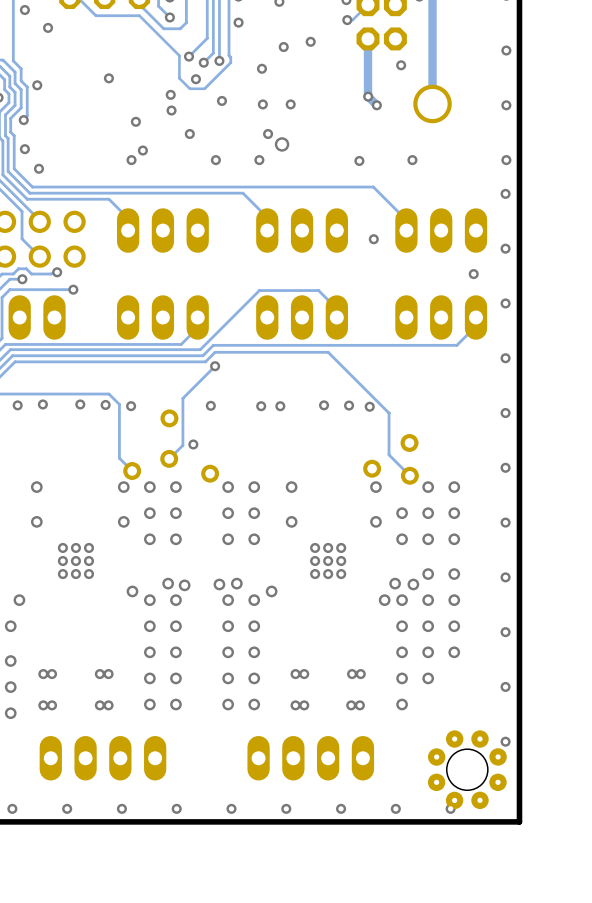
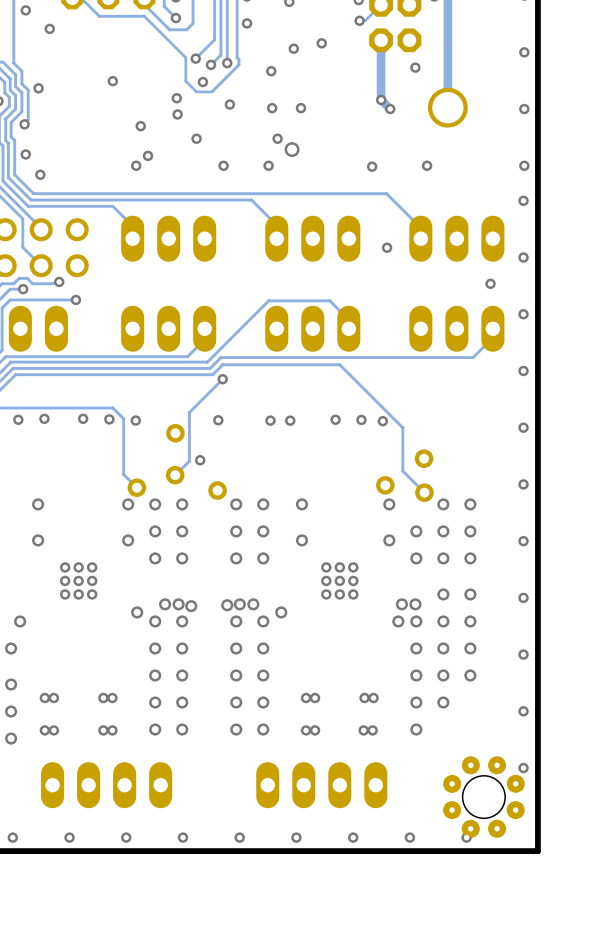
via: none -> (165, 604)
via: (168, 583) -> none
via: none -> (178, 604)
via: none -> (239, 604)
via: (236, 583) -> none
via: none -> (253, 604)
via: none -> (401, 604)
via: (395, 583) -> none
via: none -> (415, 604)
via: (413, 584) -> none

